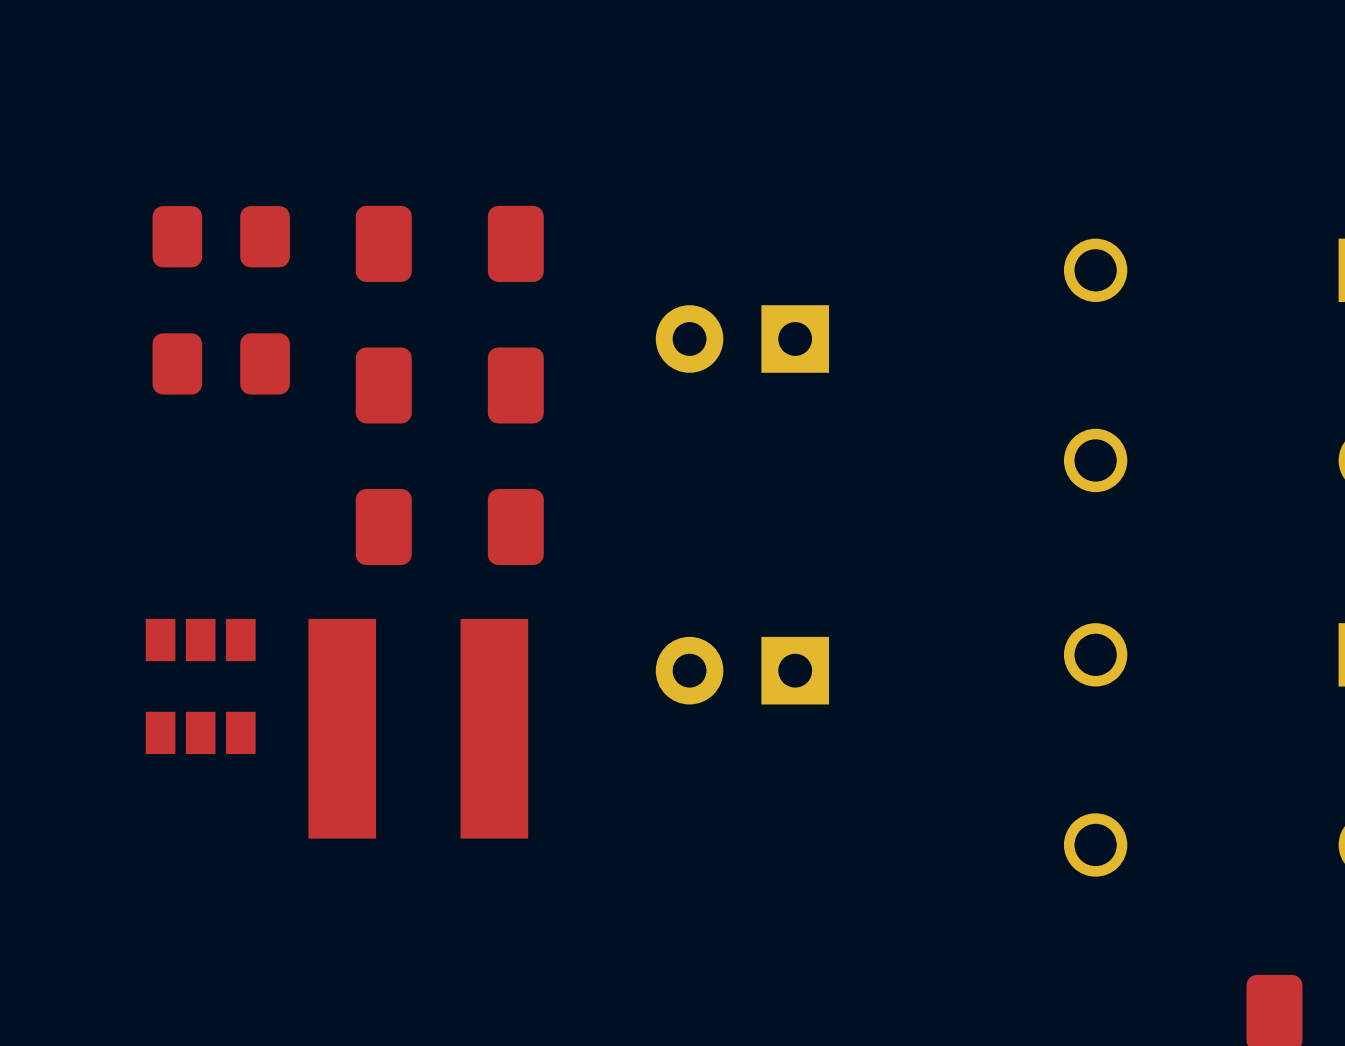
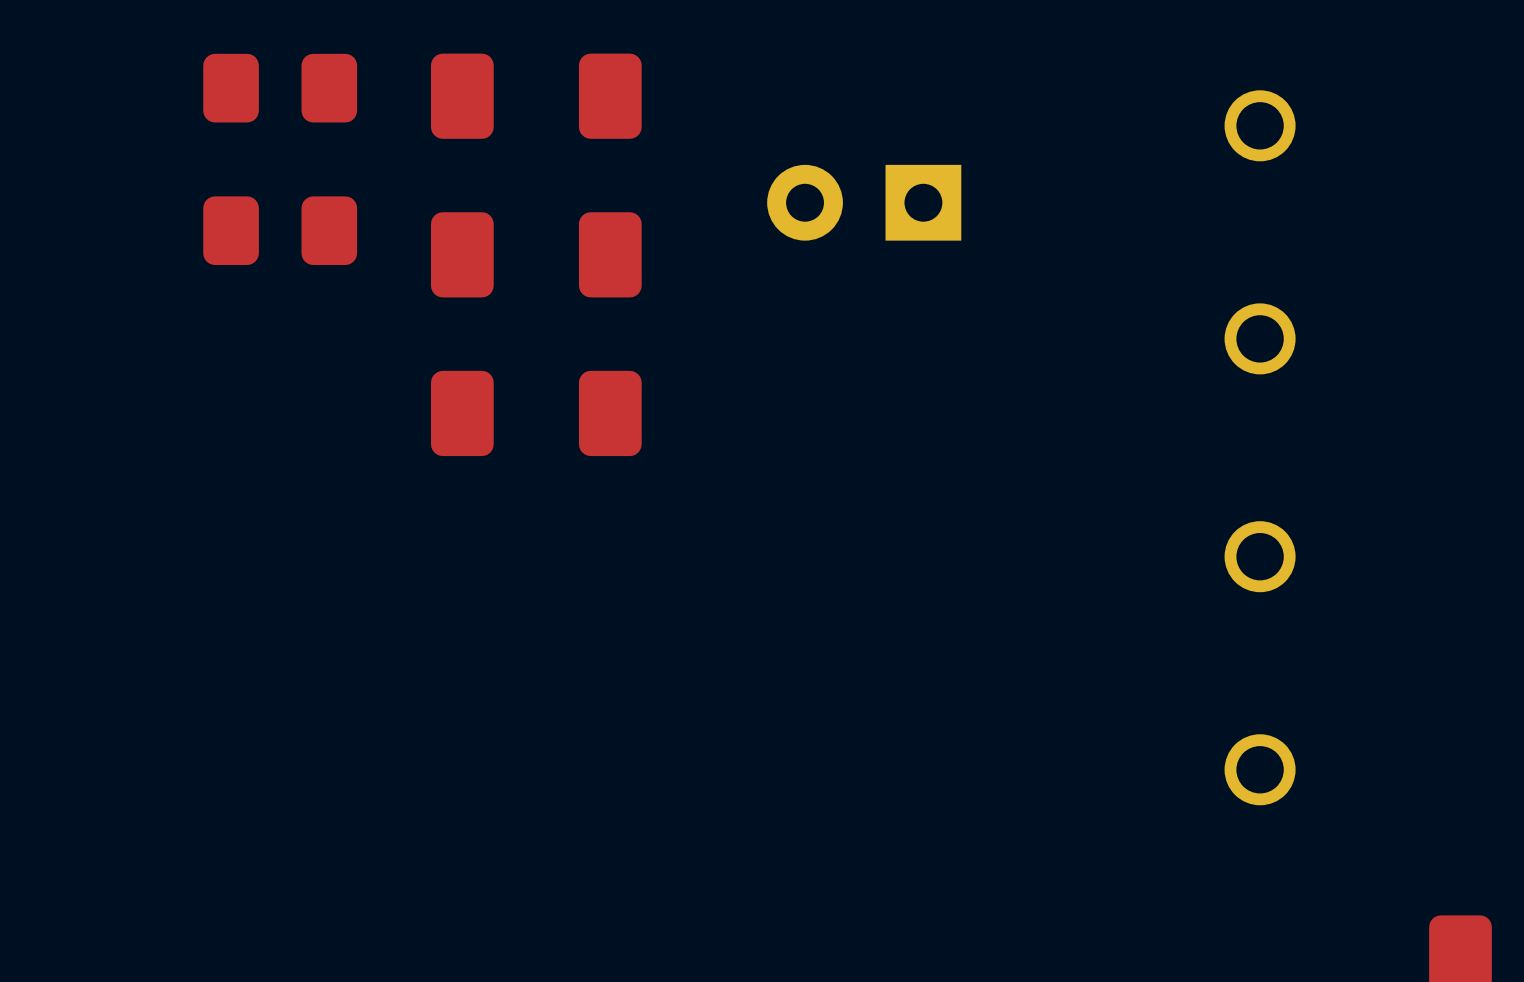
part: (742, 670) -> none
part: (200, 686) -> none
part: (418, 728) -> none

